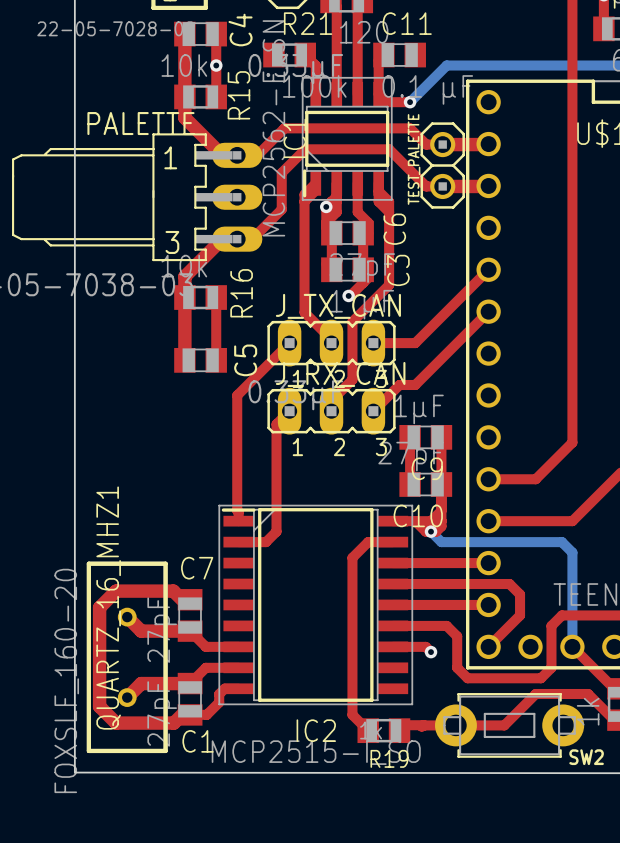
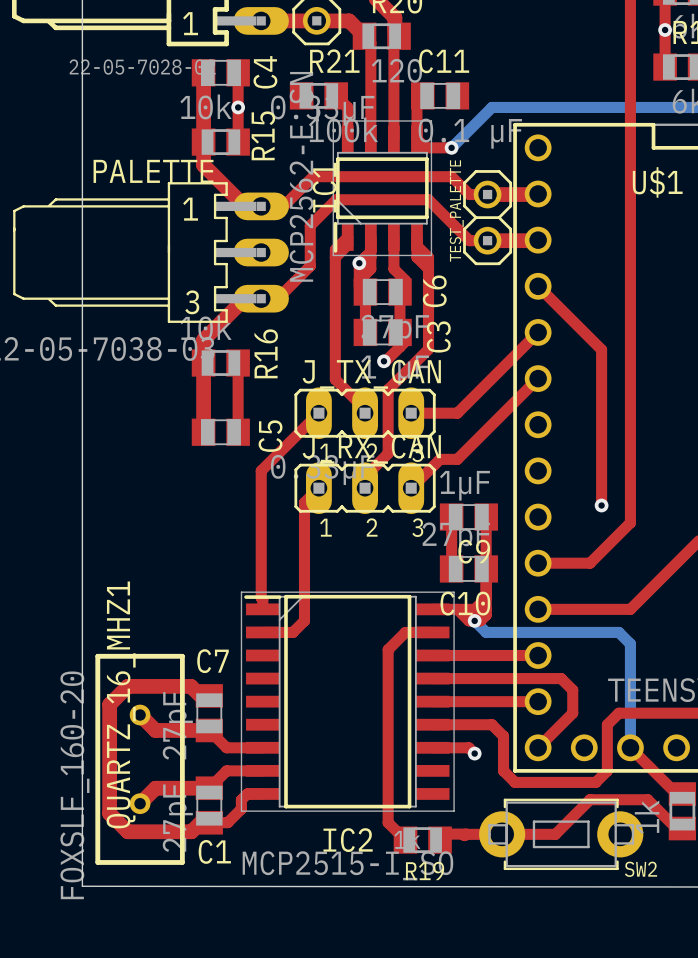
top track: none -> (538, 286) (601, 349) (601, 505)
via: none -> (601, 505)

